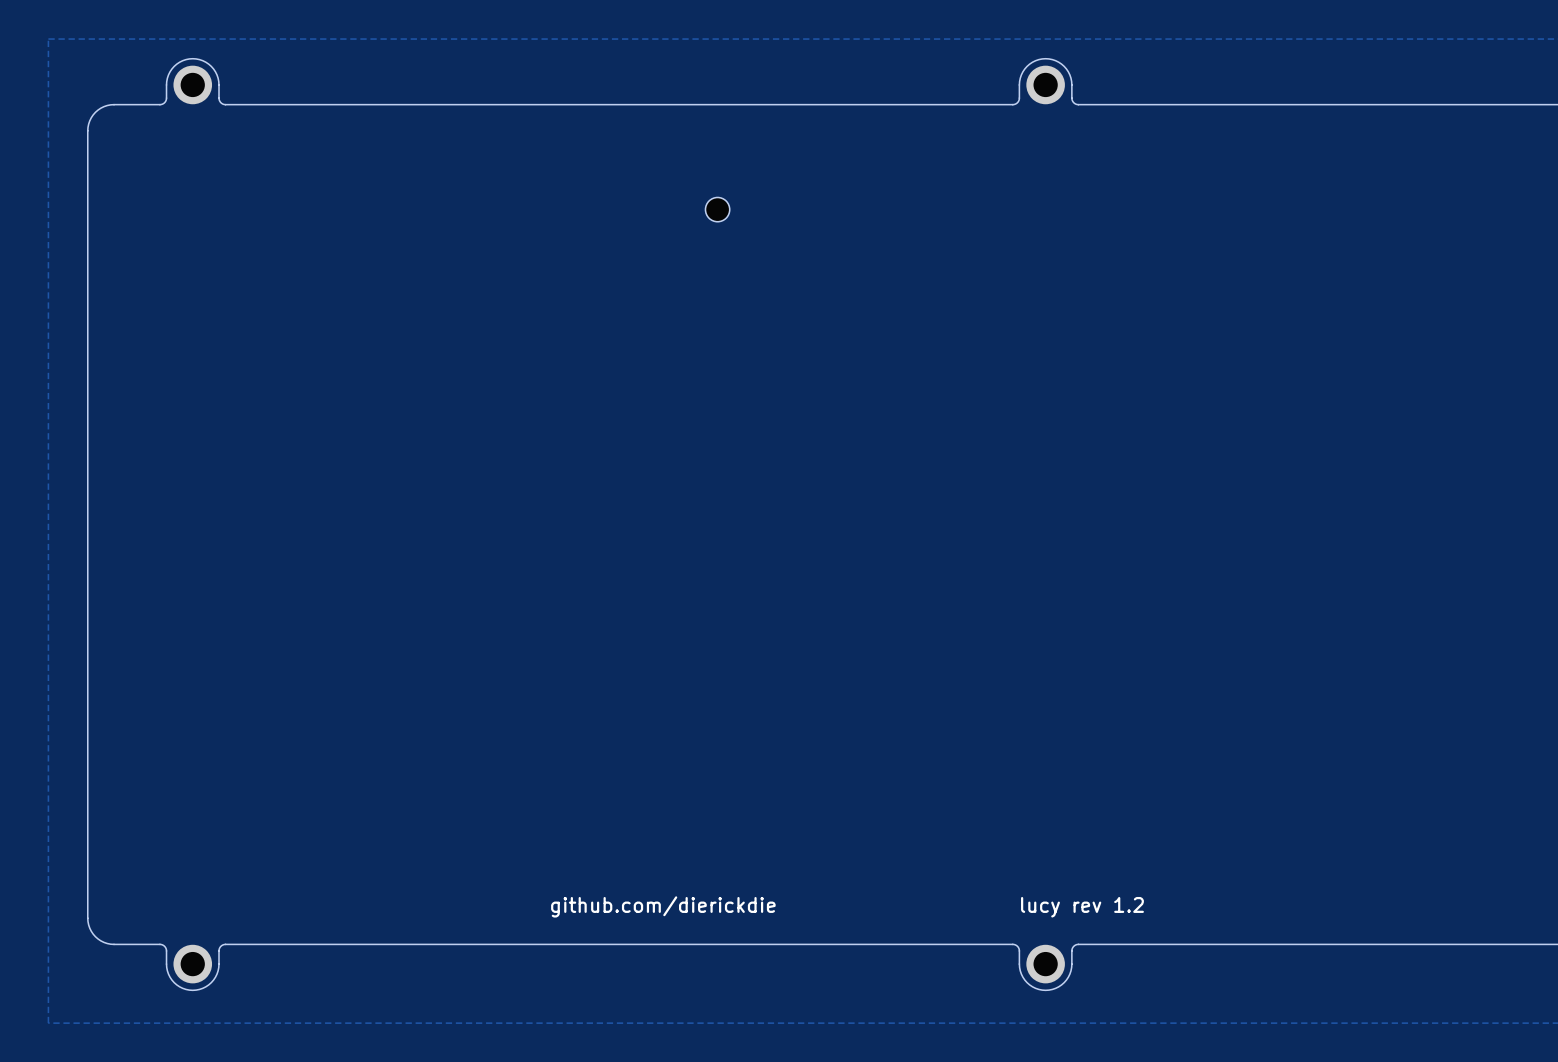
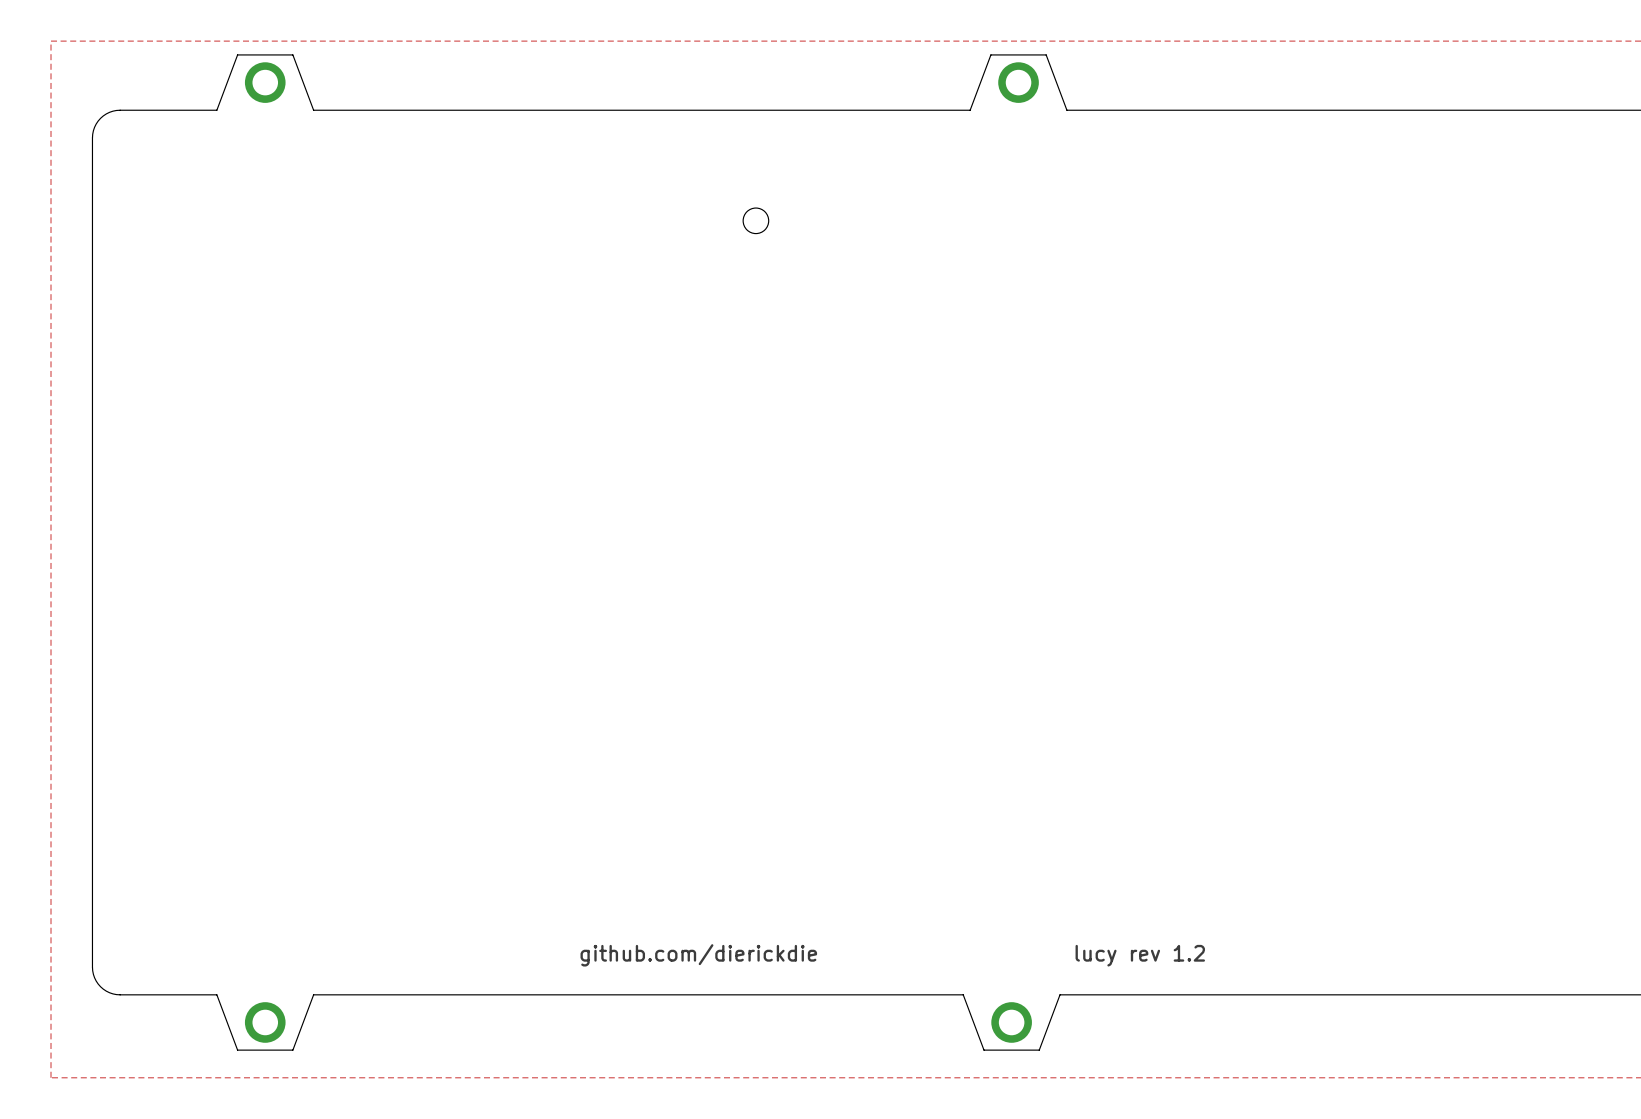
part position: (192, 84) -> (265, 82)
part position: (1045, 84) -> (1018, 82)
board edge: (297, 104) (223, 104) (219, 99) (218, 81) (213, 68) (202, 60) (189, 58) (176, 64) (170, 71) (166, 81) (166, 98) (163, 103) (103, 106) (91, 117) (87, 130) -> (313, 110) (292, 54) (237, 54) (216, 110) (112, 111) (98, 121) (92, 137)
board edge: (920, 104) (1015, 104) (1019, 99) (1019, 81) (1022, 71) (1032, 62) (1045, 58) (1058, 62) (1066, 68) (1071, 81) (1072, 99) (1078, 104) -> (970, 110) (990, 54) (1046, 54) (1066, 110) (1136, 110)
board edge: (159, 944) (166, 949) (166, 967) (171, 980) (179, 986) (192, 990) (205, 986) (215, 977) (218, 967) (219, 949) (223, 944) (297, 944) -> (168, 994) (216, 994) (237, 1050) (292, 1050) (313, 994)
board edge: (914, 944) (1006, 944) -> (963, 994) (983, 1050) (1039, 1050) (1060, 994)
board edge: (1012, 944) (1019, 949) (1019, 967) (1024, 980) (1032, 986) (1045, 990) (1058, 986) (1066, 980) (1071, 967) (1072, 949) (1078, 944) -> (1066, 994) (1136, 994)
part position: (192, 964) -> (265, 1022)
part position: (1045, 964) -> (1011, 1022)

